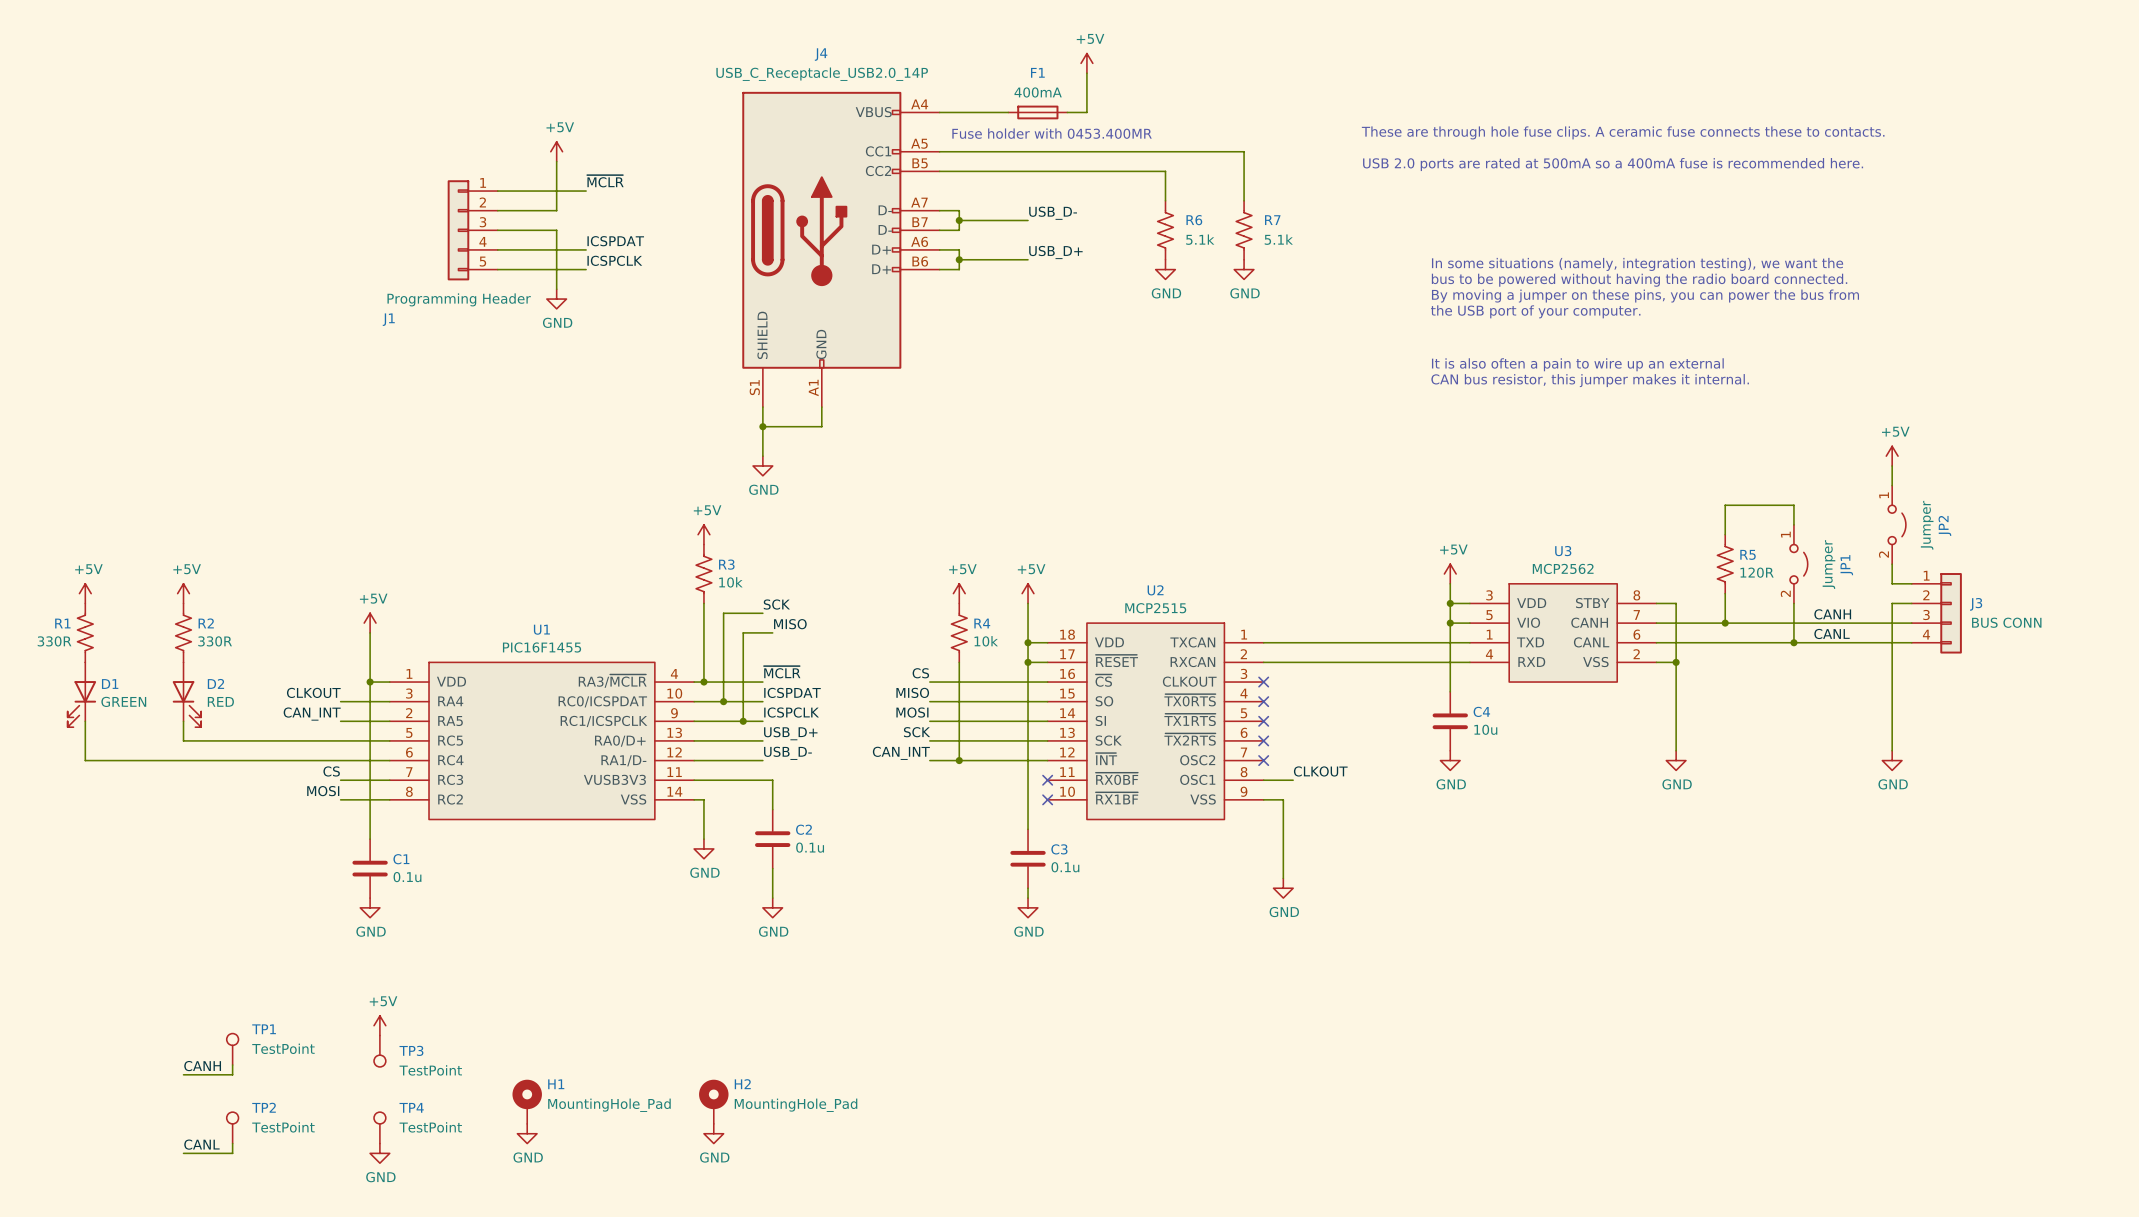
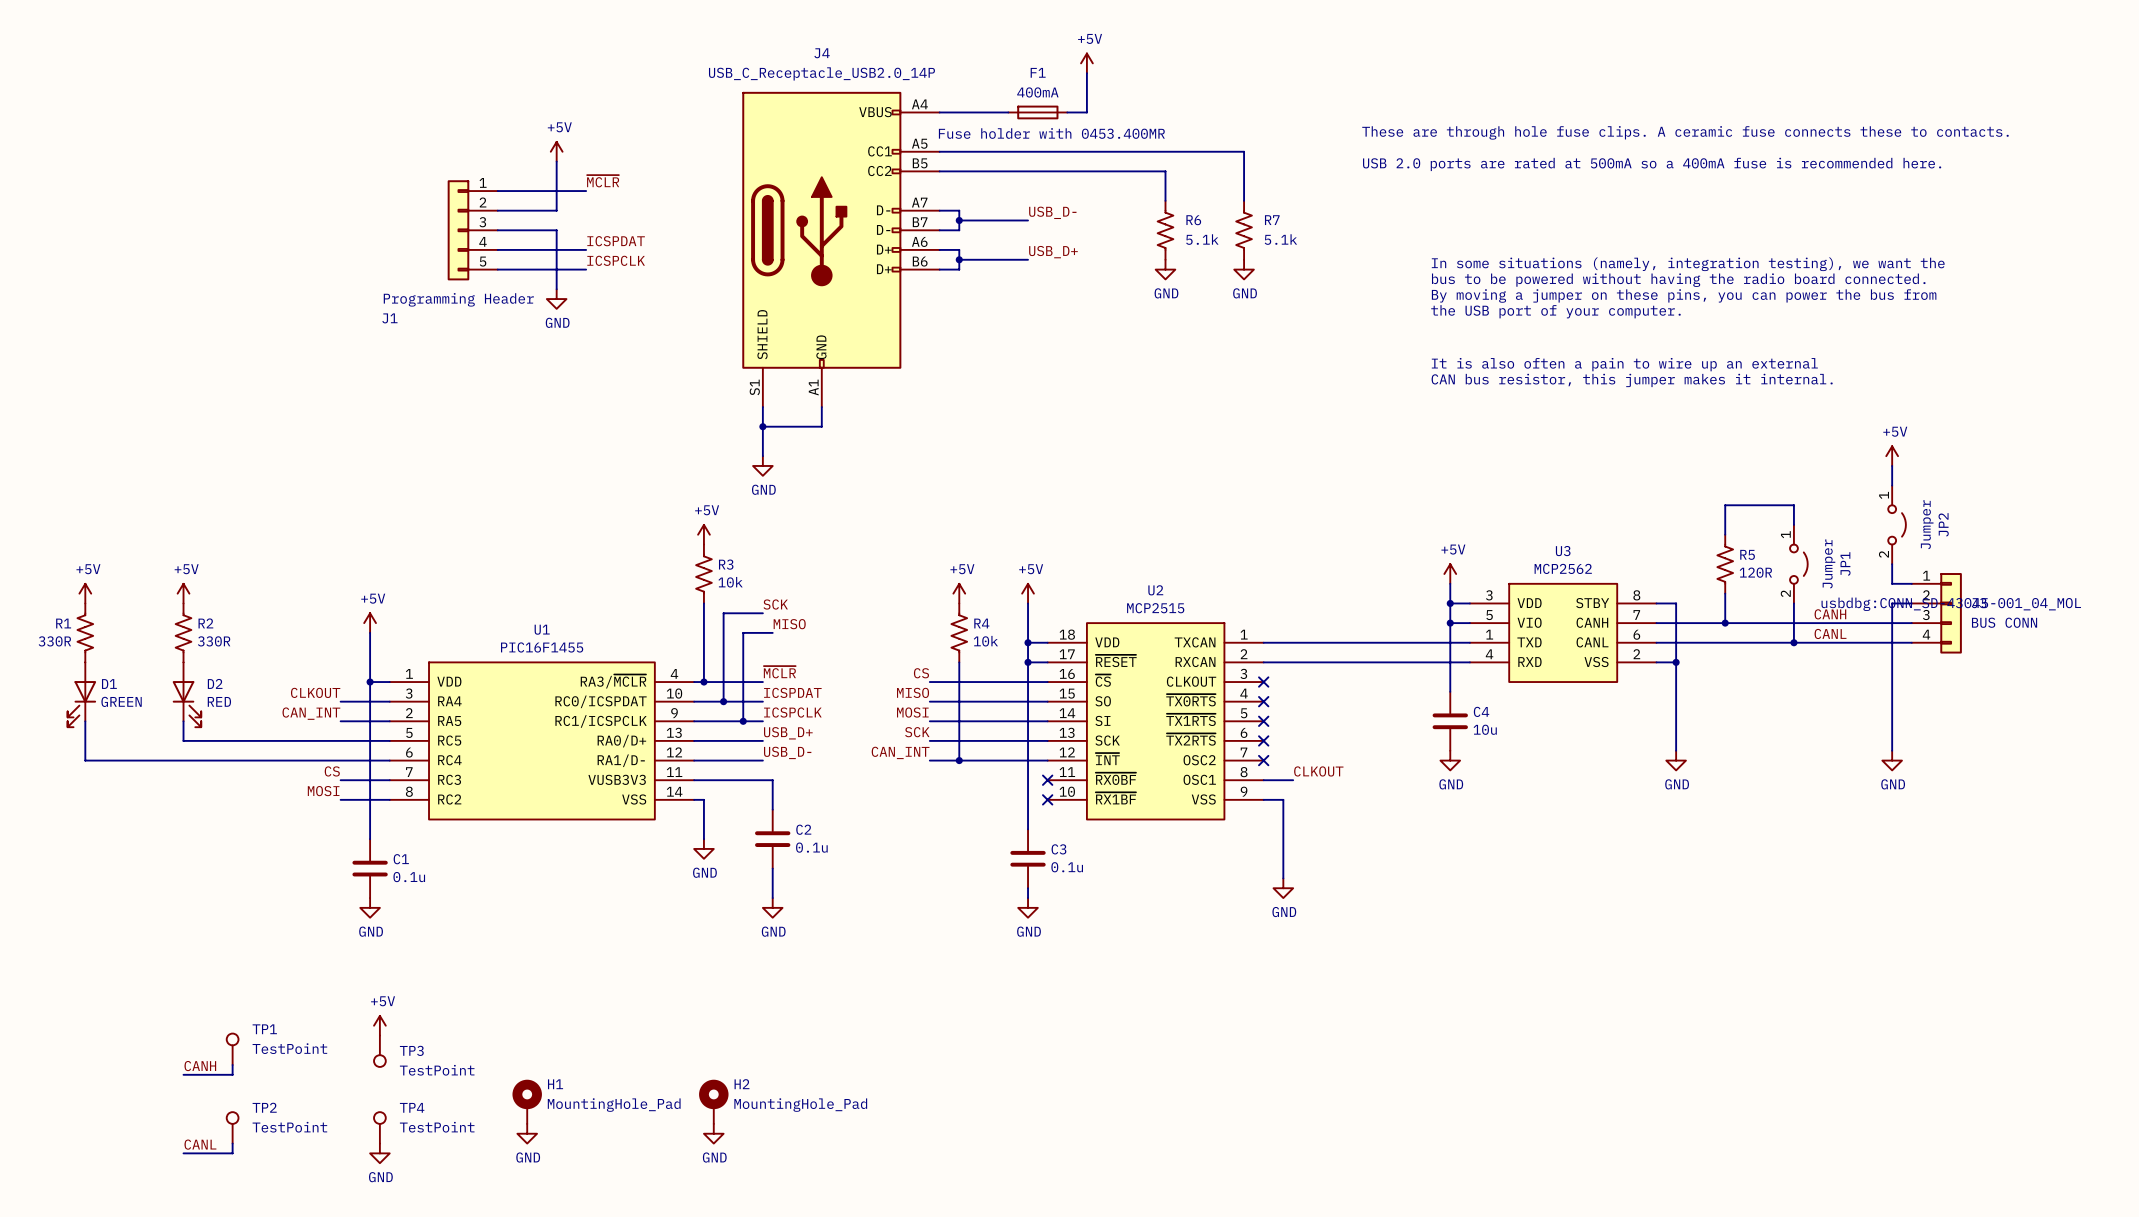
J3 text: none -> usbdbg:CONN_SD-43045-001_04_MOL (1951, 604)

